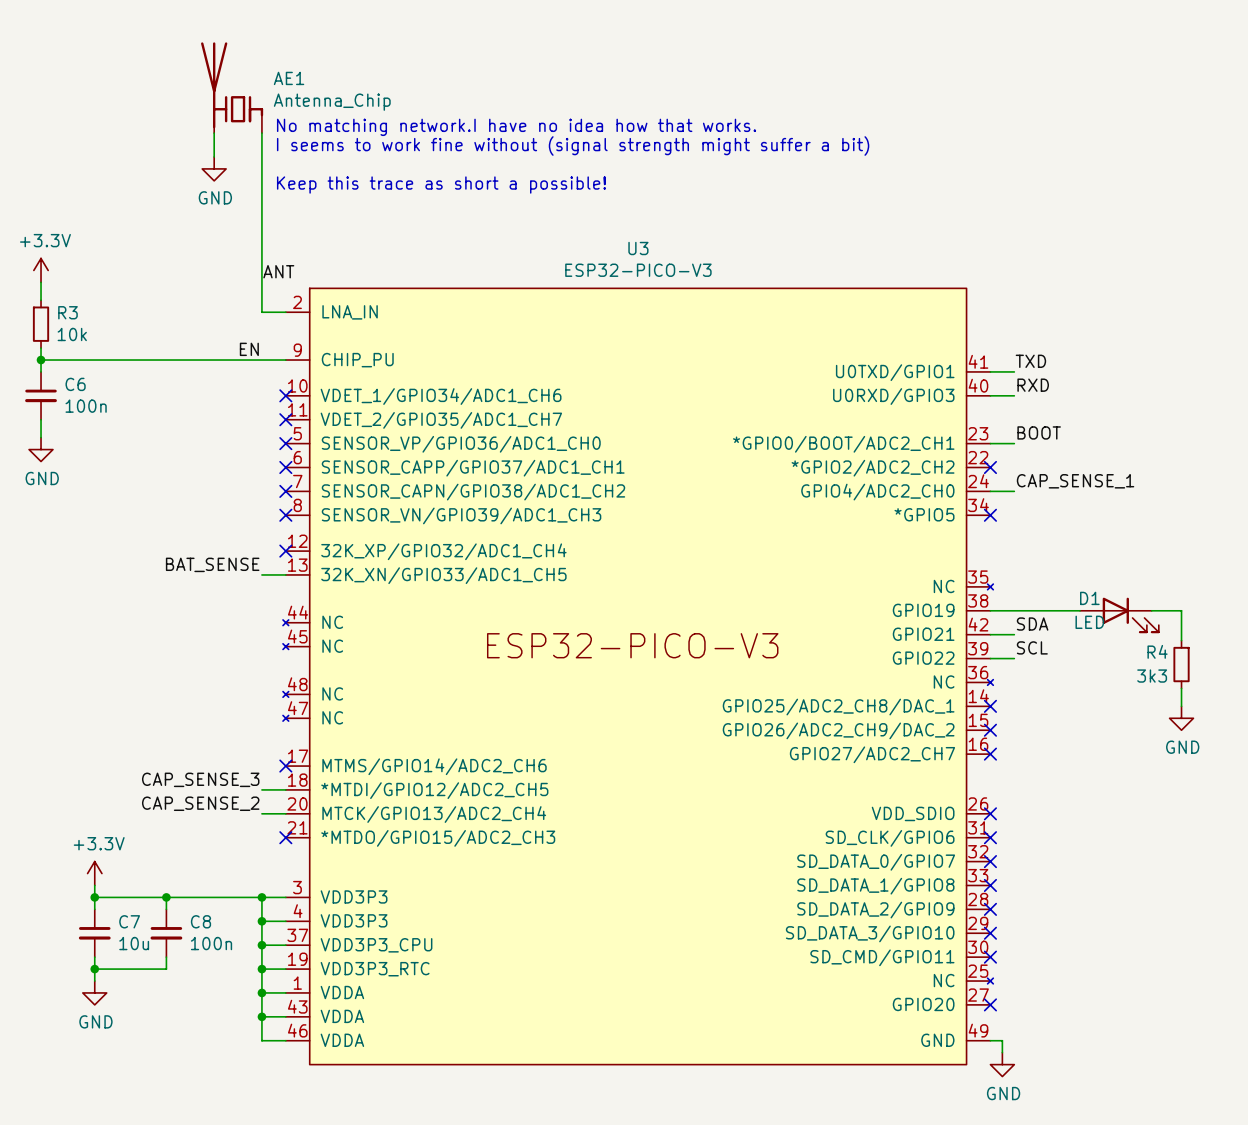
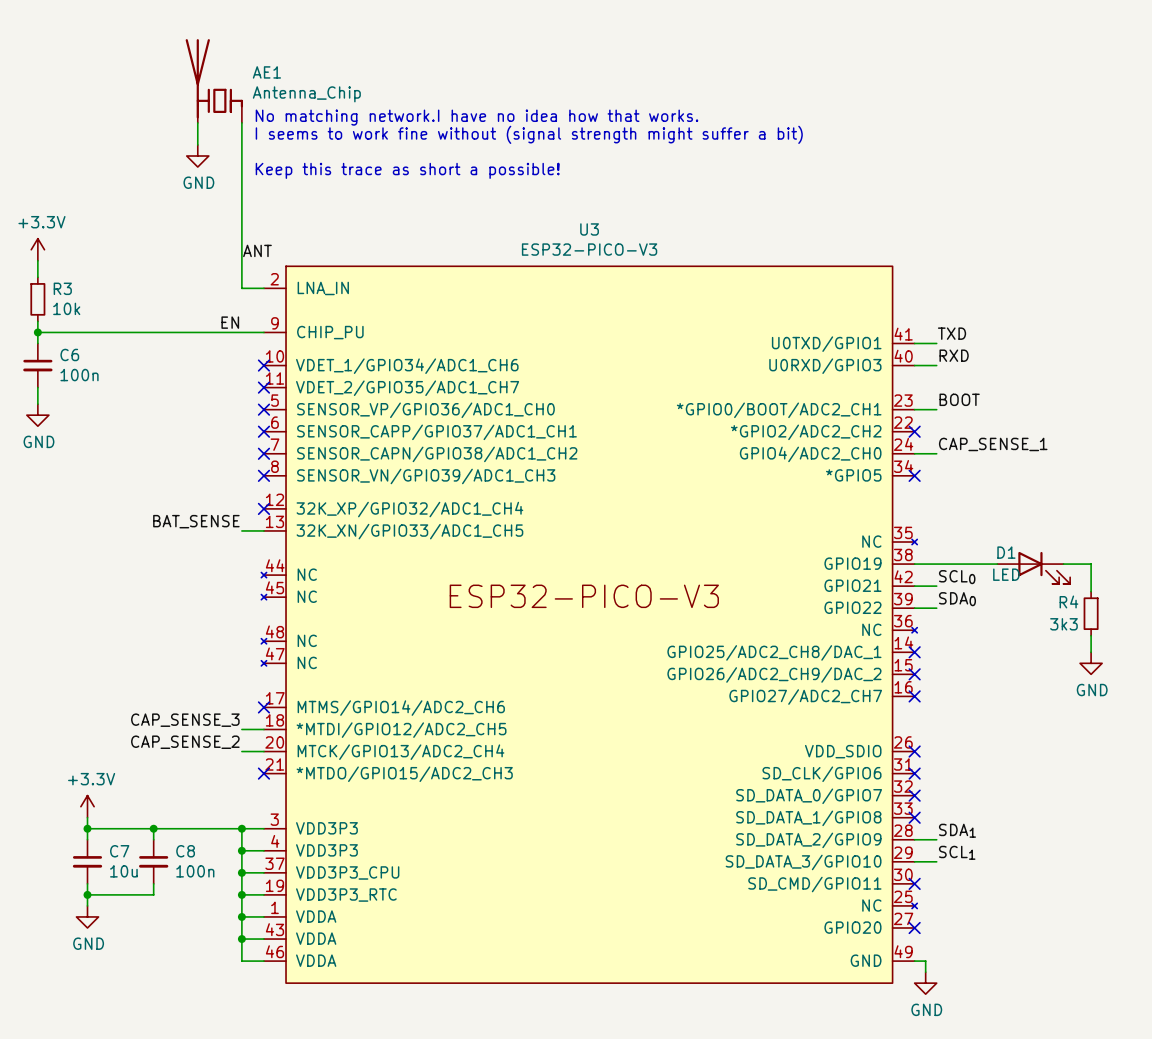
label: SDA (1032, 624) -> SCL0 (957, 577)
label: SCL (1032, 647) -> SDA0 (957, 599)
label: none -> SDA1 (957, 830)
wire: none -> (914, 839) (936, 839)
no-connect mark: (990, 909) -> none
label: none -> SCL1 (957, 852)
wire: none -> (914, 861) (936, 861)
no-connect mark: (990, 933) -> none

